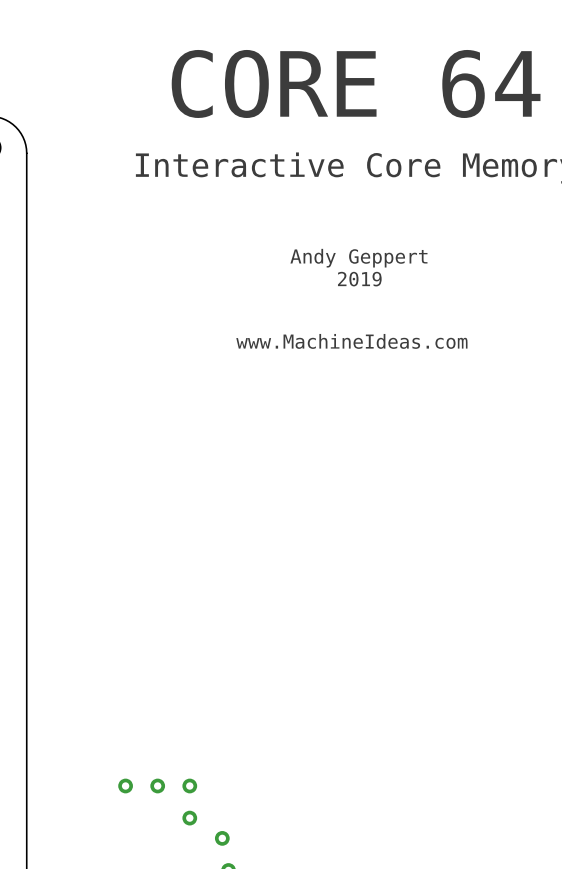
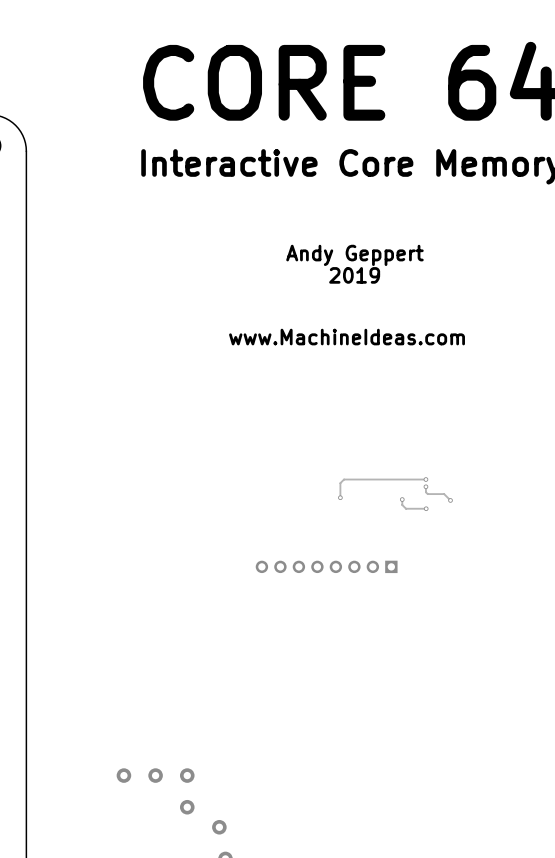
track: none -> (425, 479) (344, 479) (340, 483) (340, 497)
via: none -> (425, 479)
track: none -> (425, 486) (427, 494) (444, 494) (450, 500)
via: none -> (425, 486)
via: none -> (340, 497)
track: none -> (402, 499) (402, 505) (406, 508) (426, 508)
via: none -> (402, 499)
via: none -> (450, 500)
via: none -> (426, 508)
part: none -> (326, 566)

